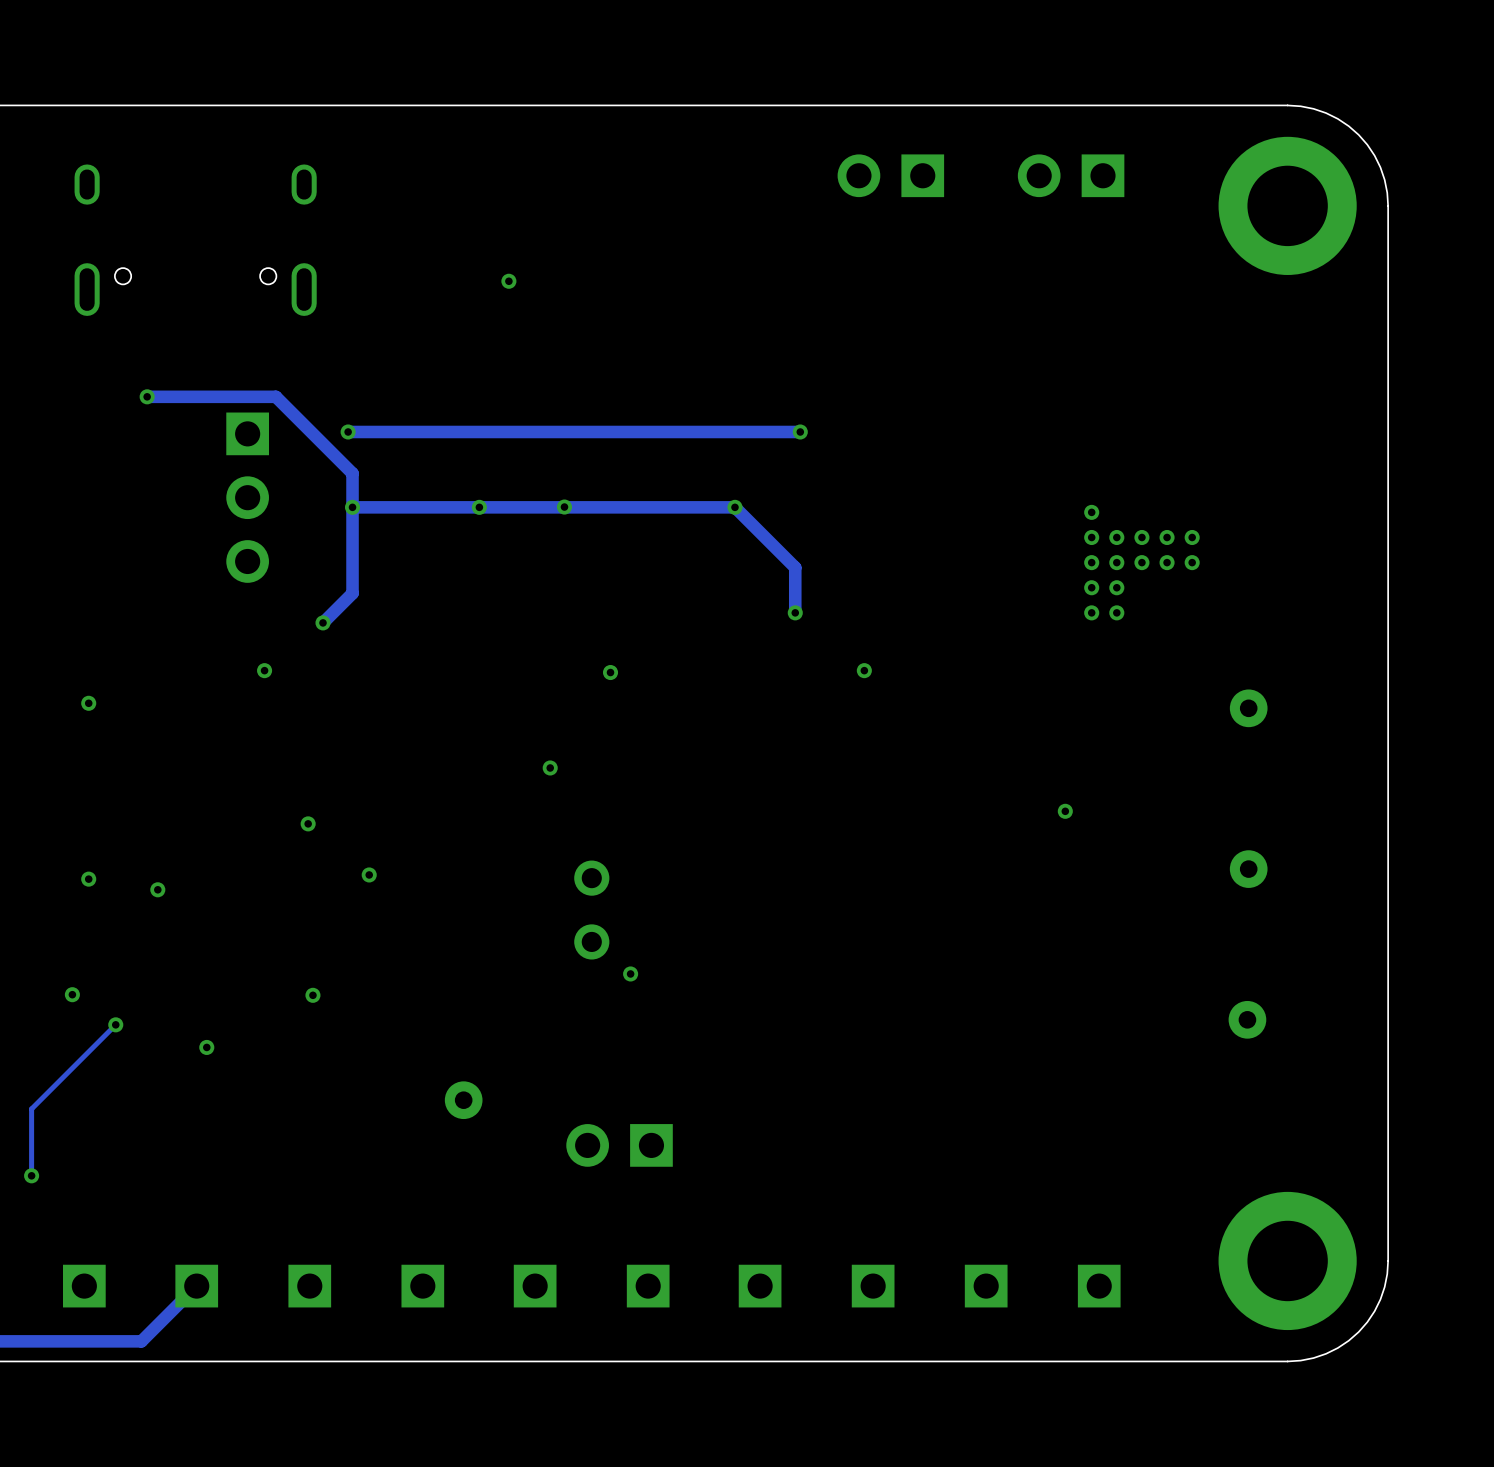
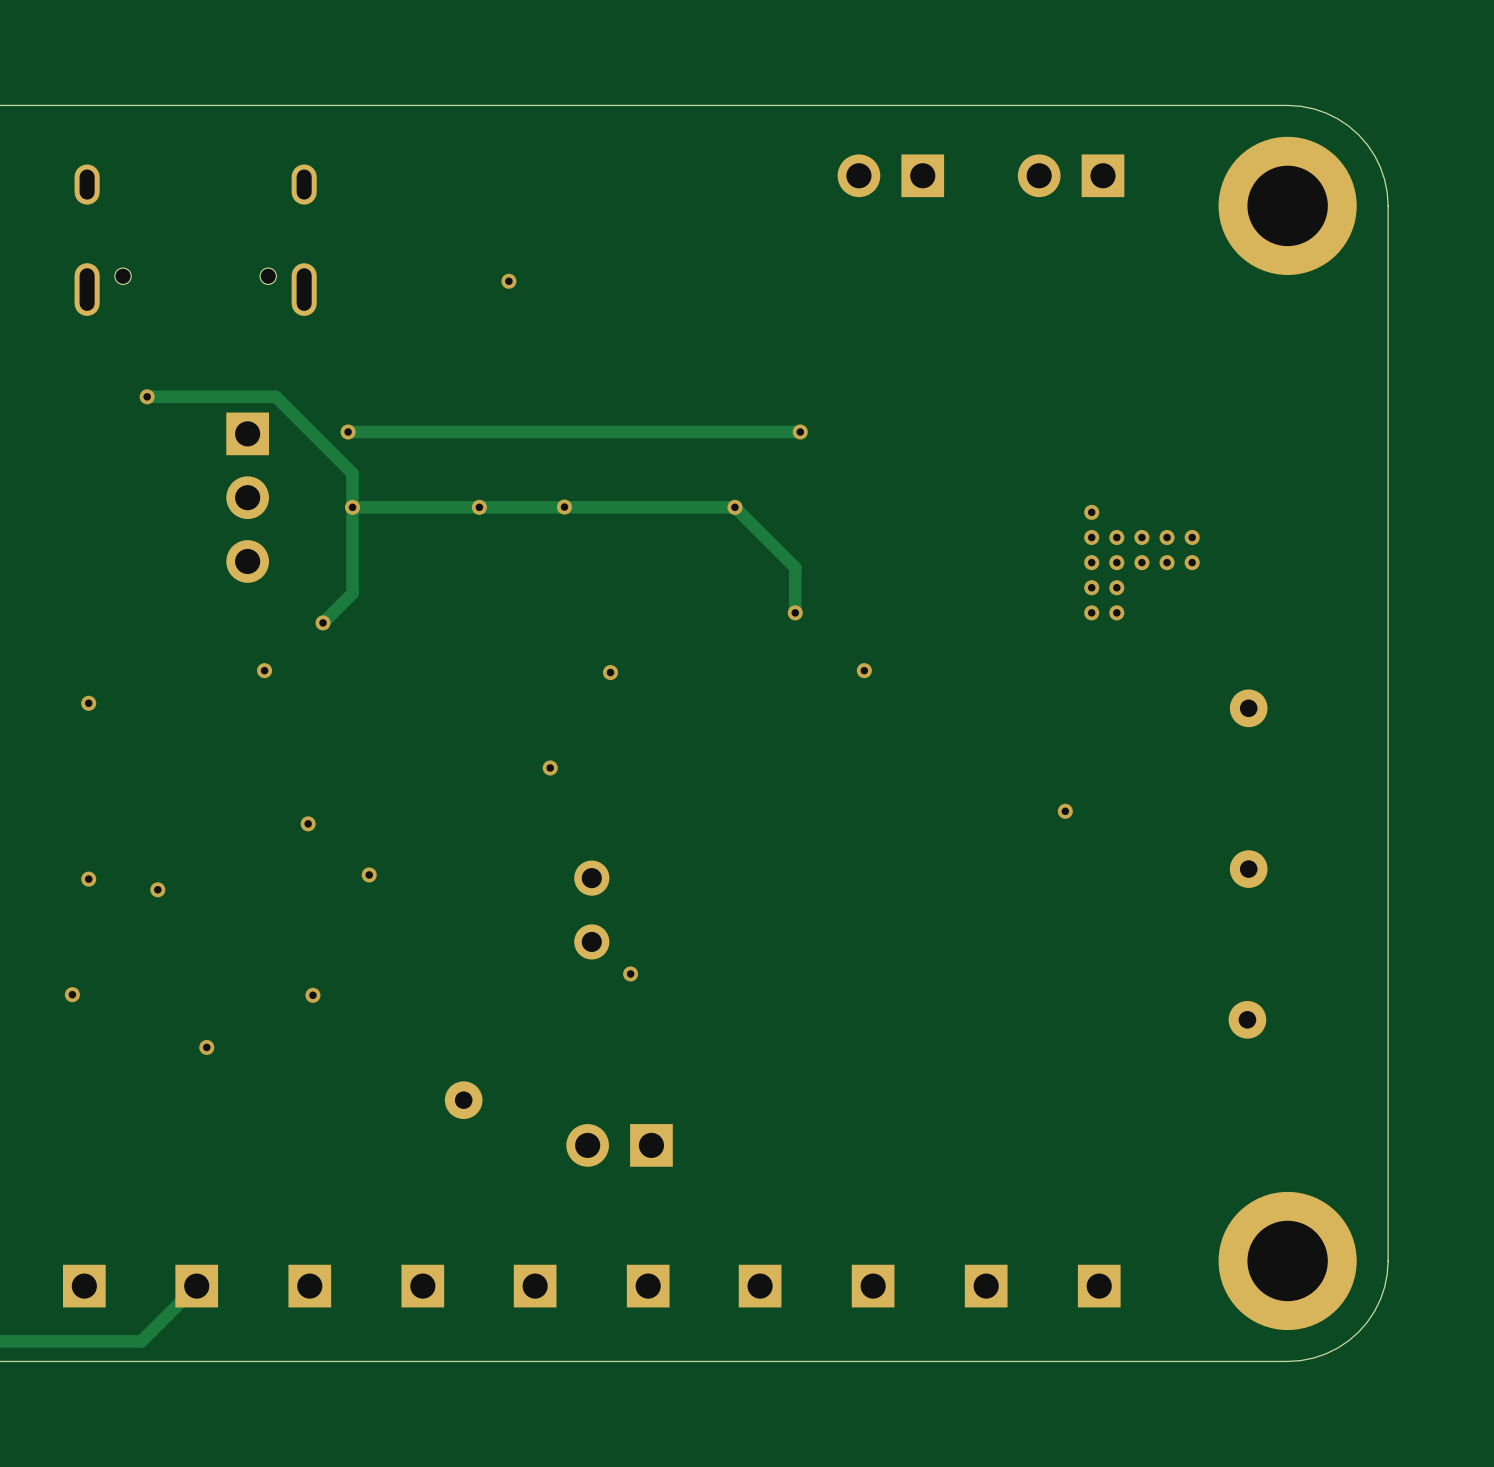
track: (115, 1024) (31, 1108) (31, 1175) -> none
via: (115, 1024) -> none
via: (31, 1175) -> none

